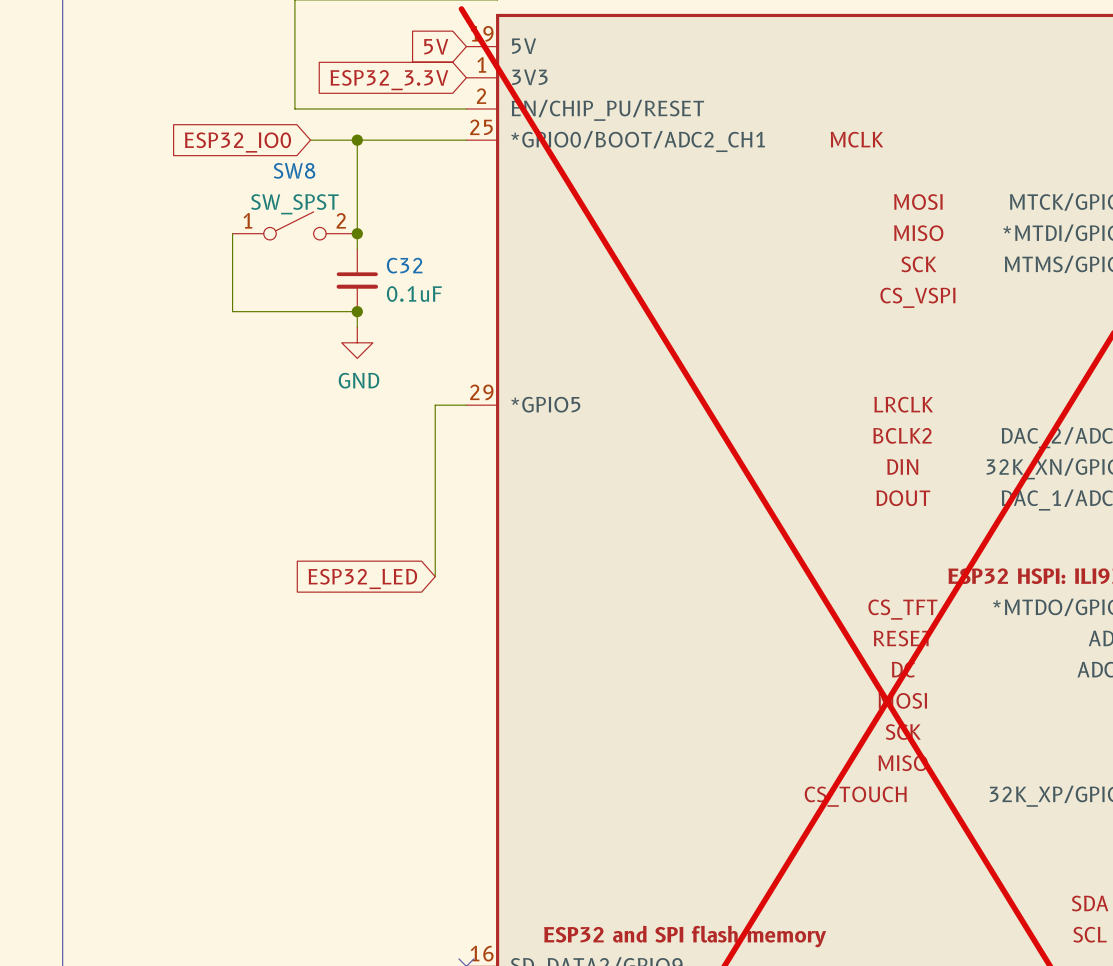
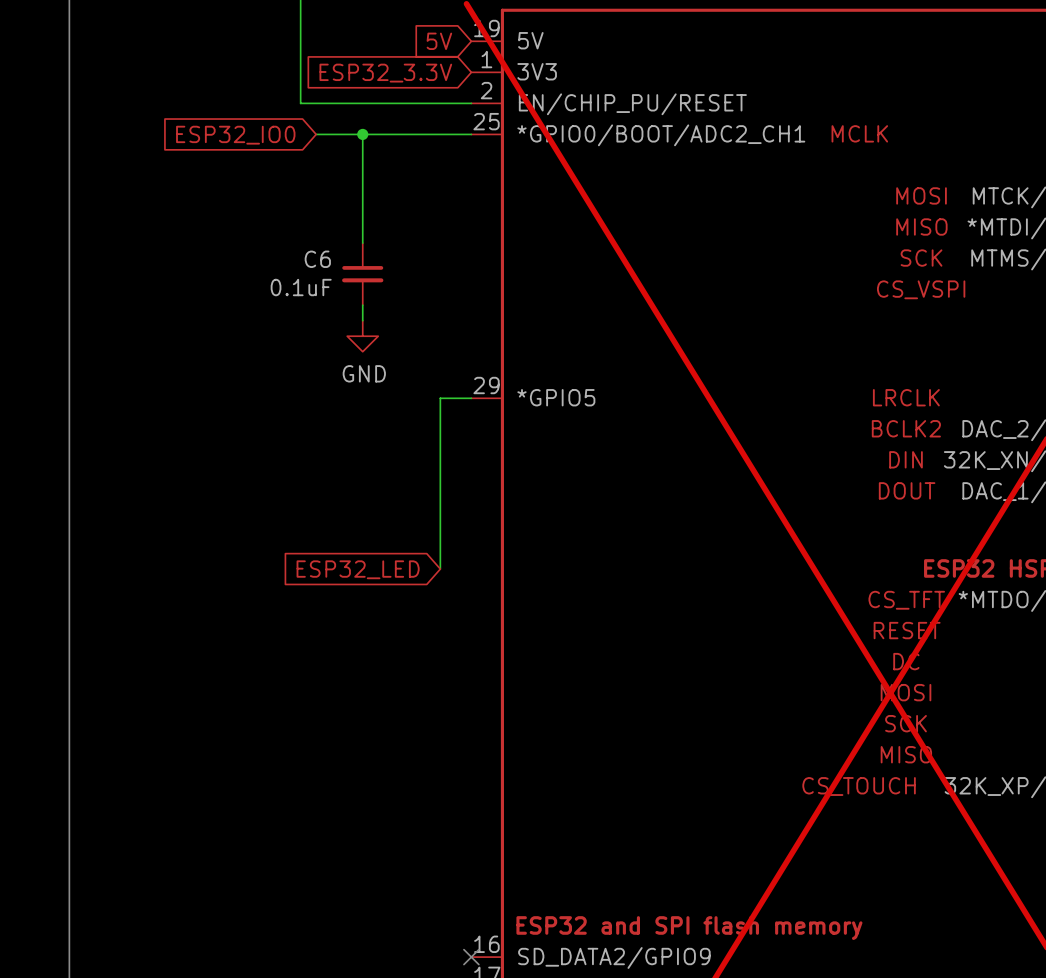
SW8: SW_SPST (294, 225) -> none
wire: (232, 233) (232, 311) (357, 311) -> none
junction: (357, 233) -> none
C32 name: C32 (404, 265) -> C6 (317, 259)
C32 value position: 0.1uF (414, 294) -> 0.1uF (301, 287)
junction: (357, 311) -> none

